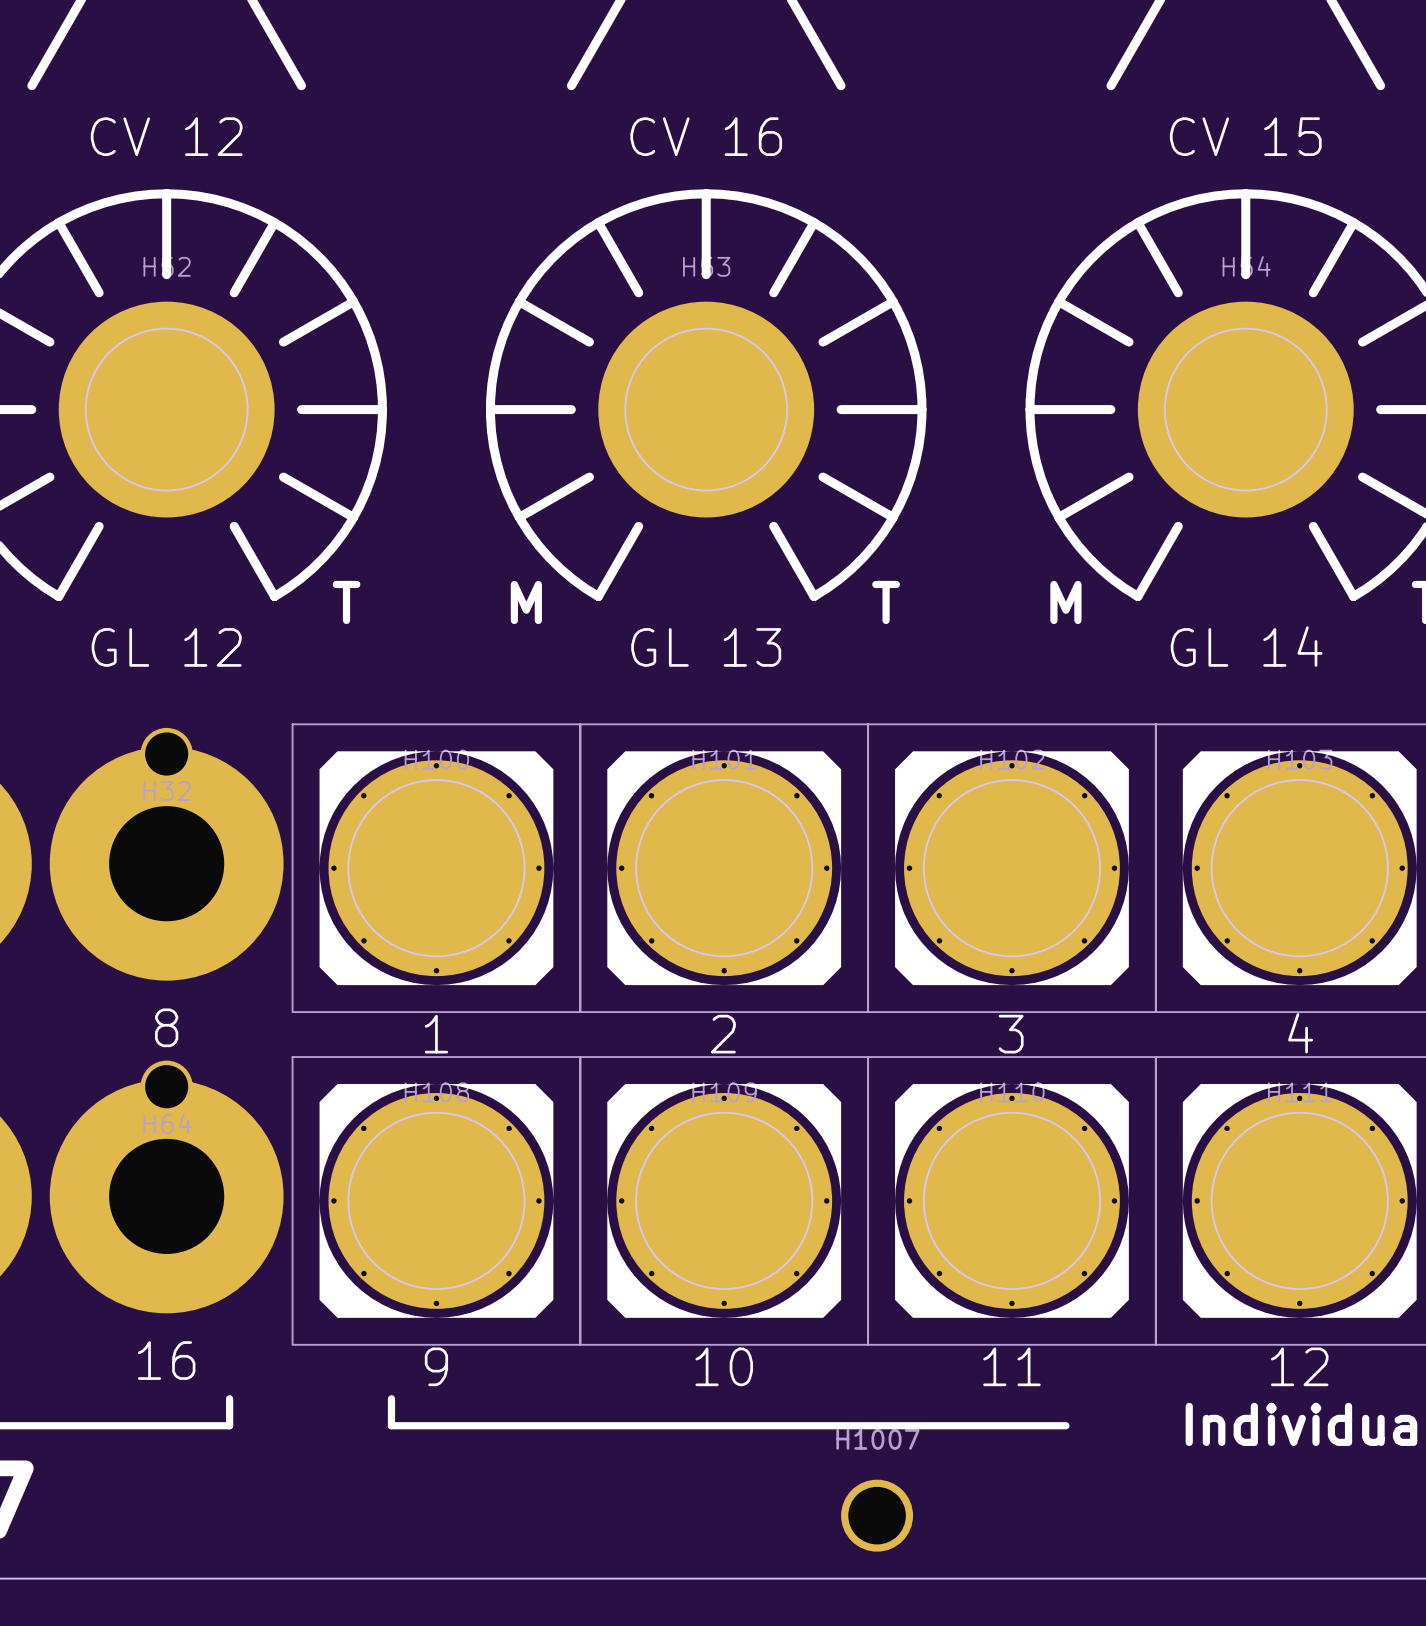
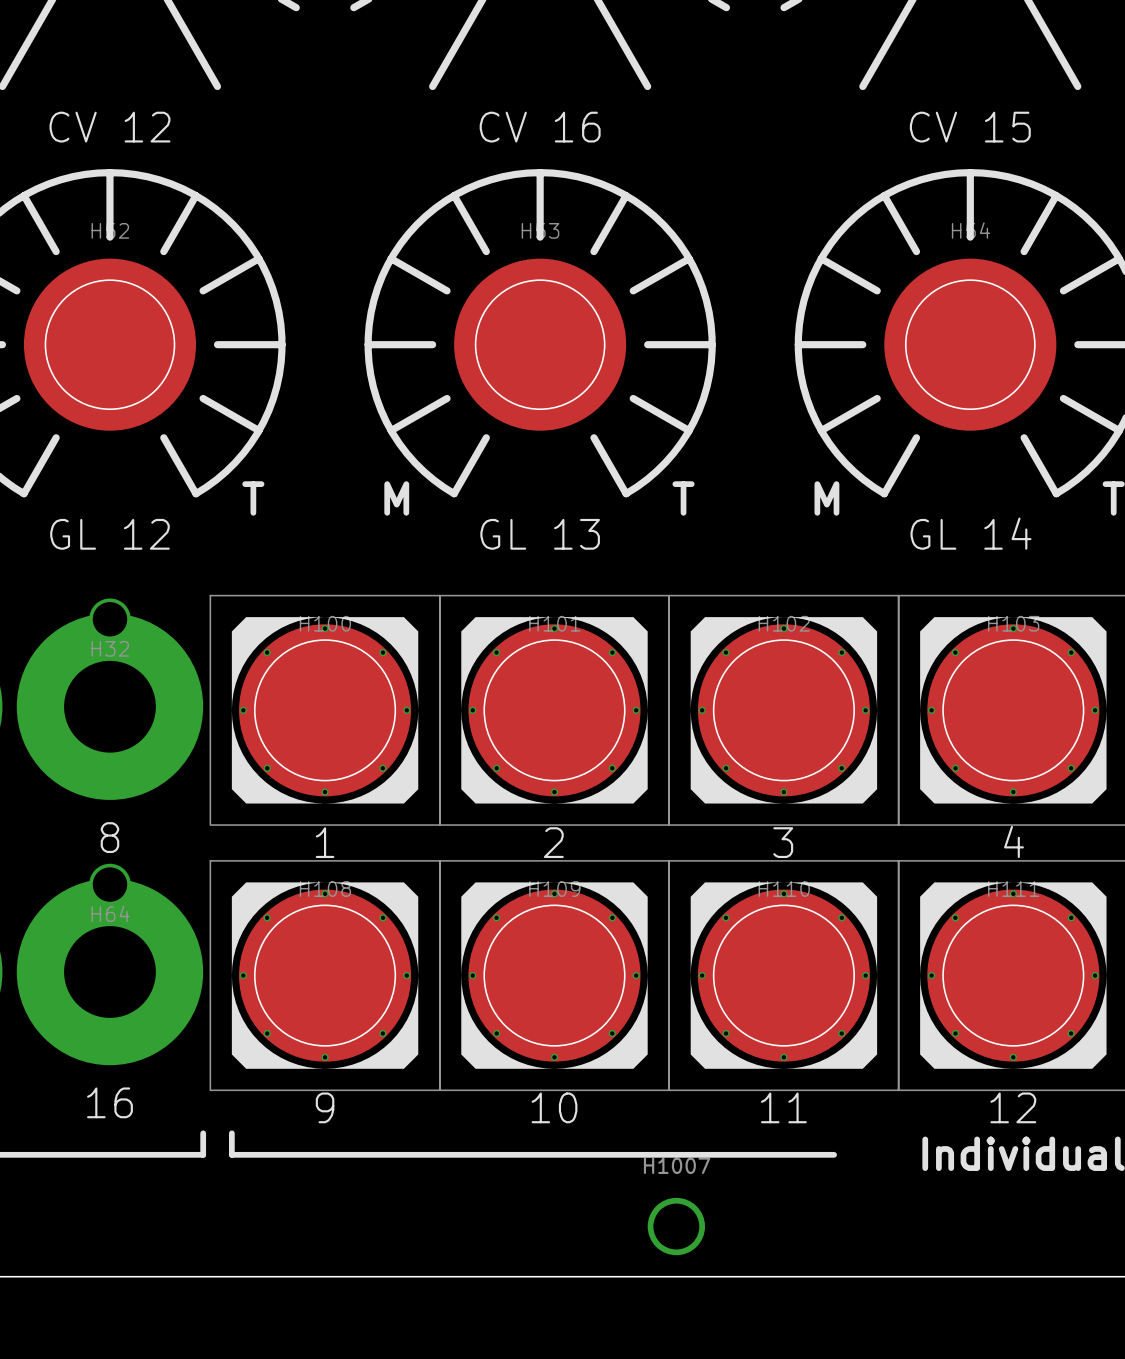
line: (229, 1398) (229, 1425) -> (203, 1133) (203, 1154) (160, 1154)
line: (391, 1398) (391, 1425) -> (231, 1133) (231, 1154) (289, 1154)
line: none -> (826, 1154) (834, 1154)

